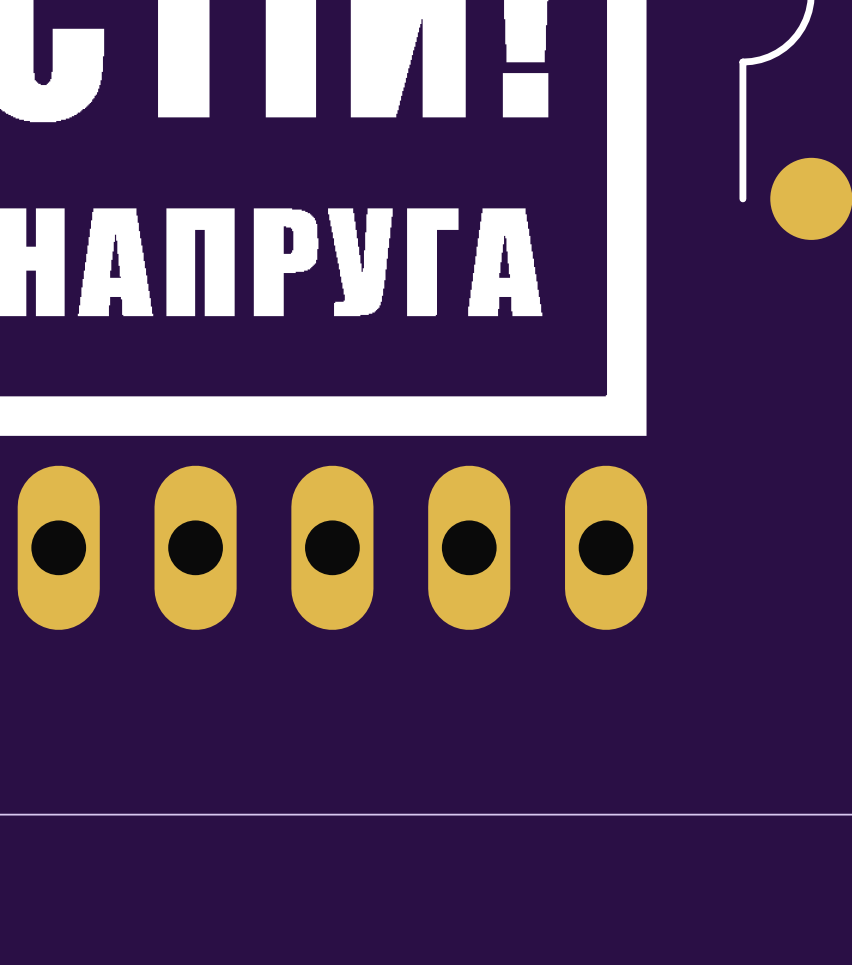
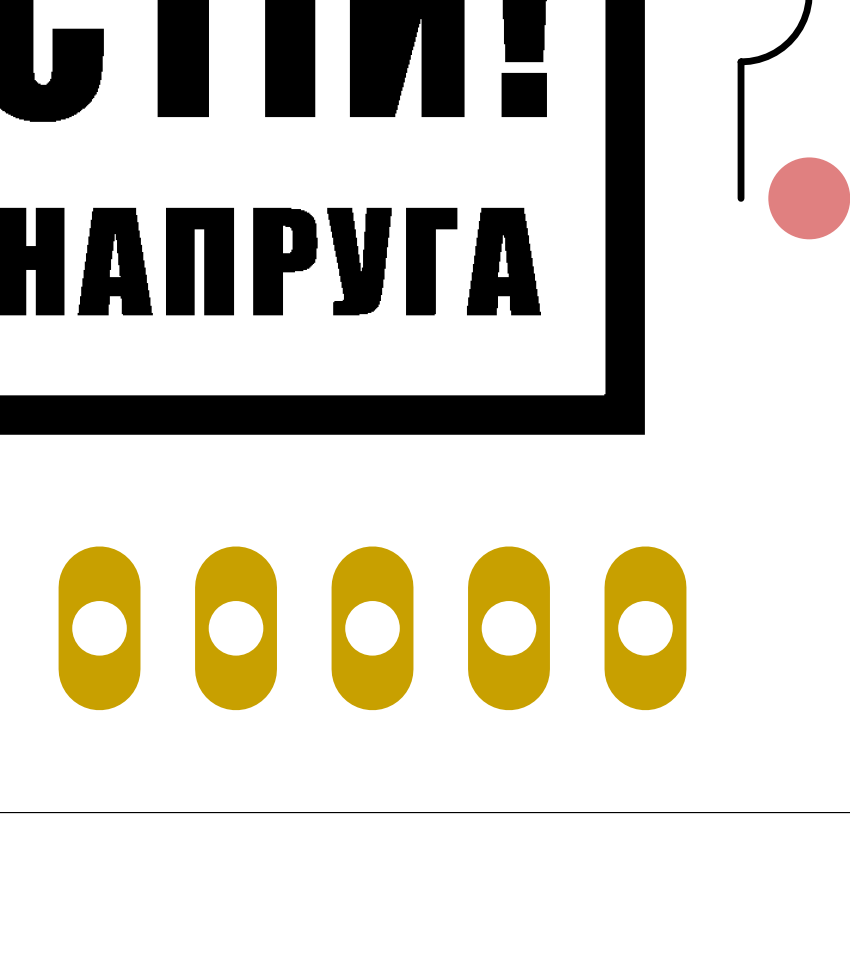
part position: (332, 547) -> (372, 628)

